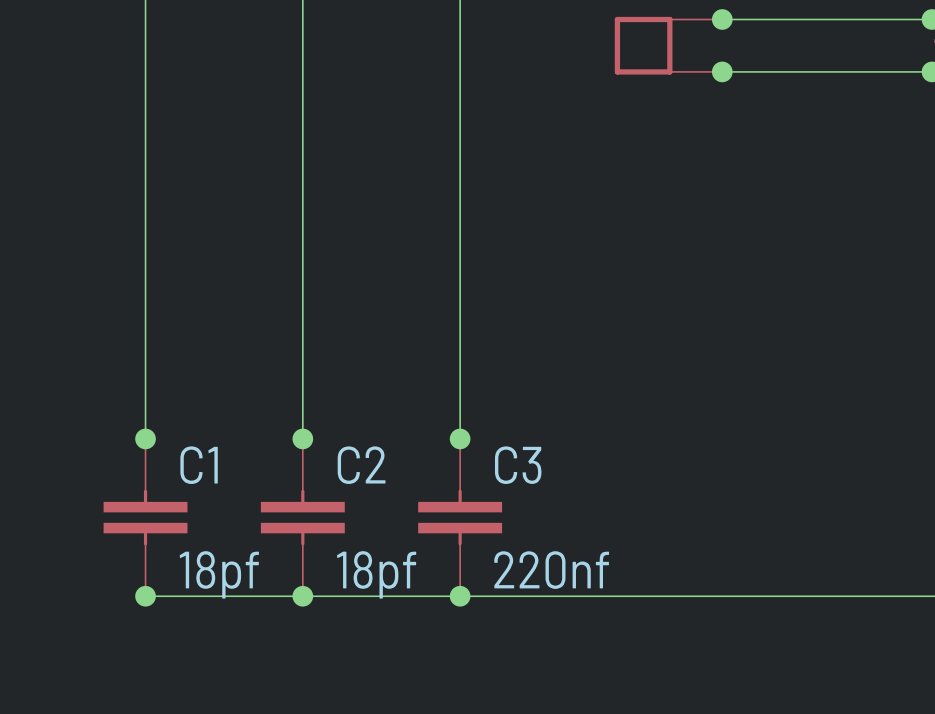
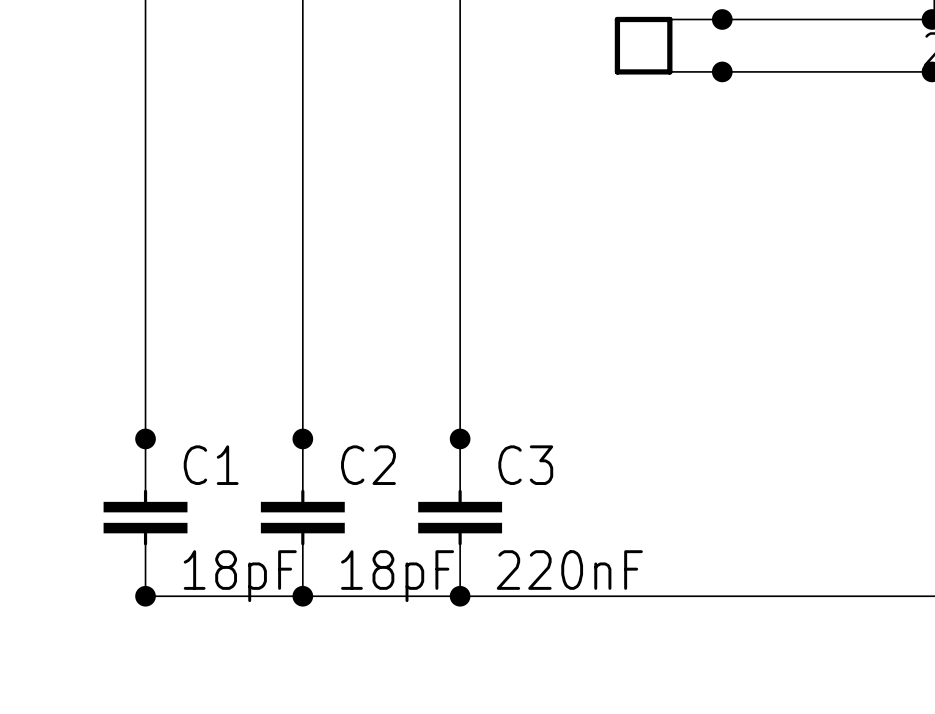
C3 value: 220nf (551, 570) -> 220nF (569, 570)
C1 value: 18pf (219, 574) -> 18pF (240, 576)
C2 value: 18pf (376, 574) -> 18pF (397, 576)

